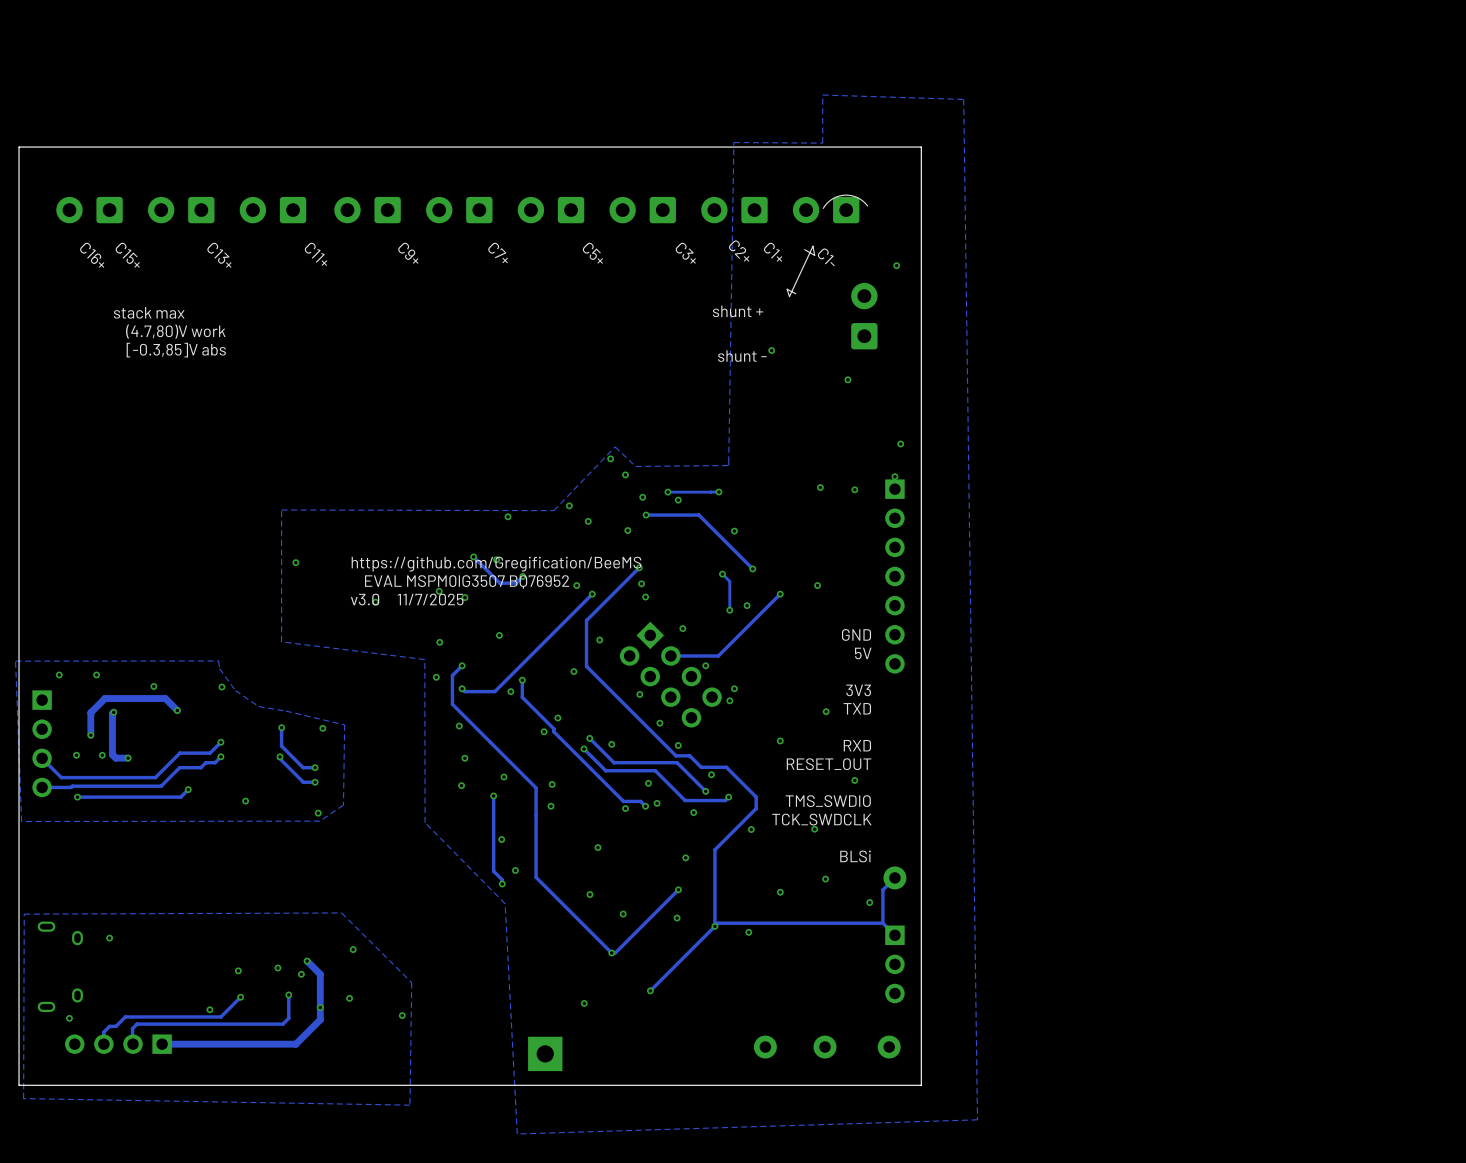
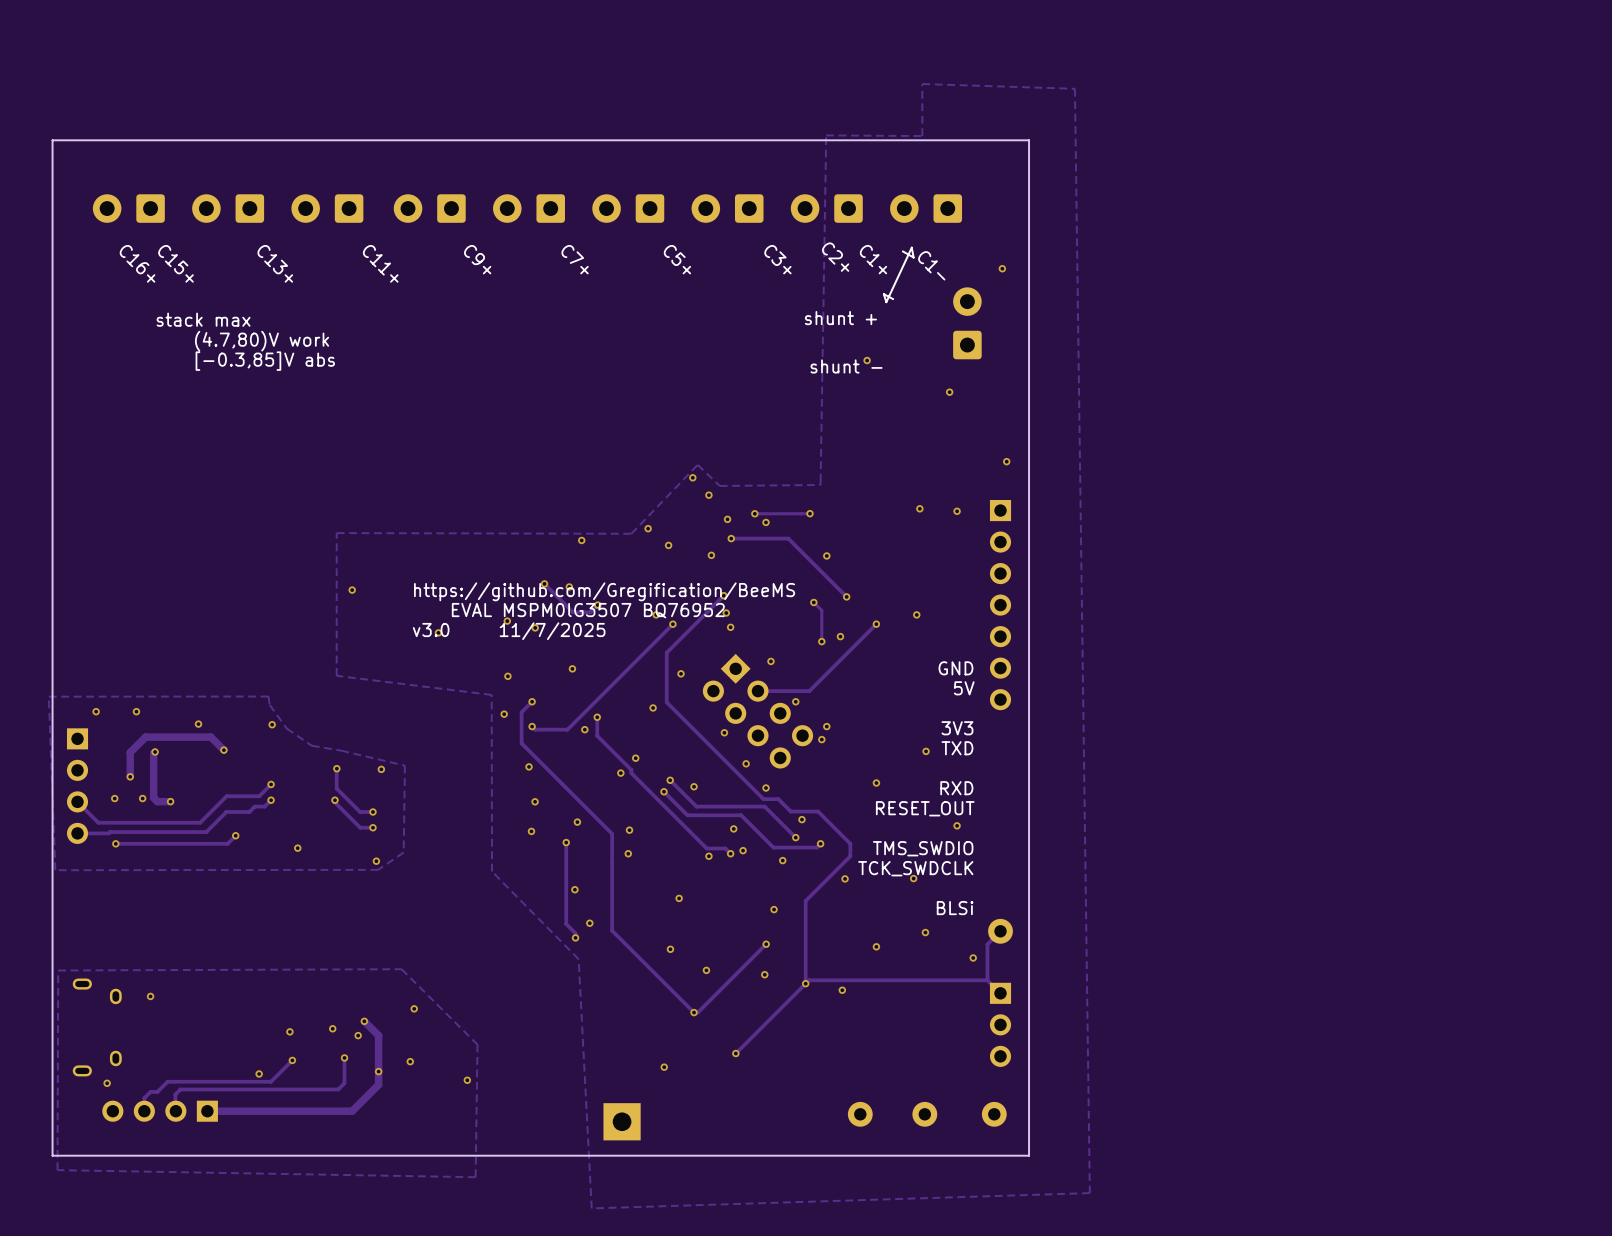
line: (867, 206) (857, 197) (844, 195) (832, 199) (823, 208) -> none
via: (894, 476) -> none

